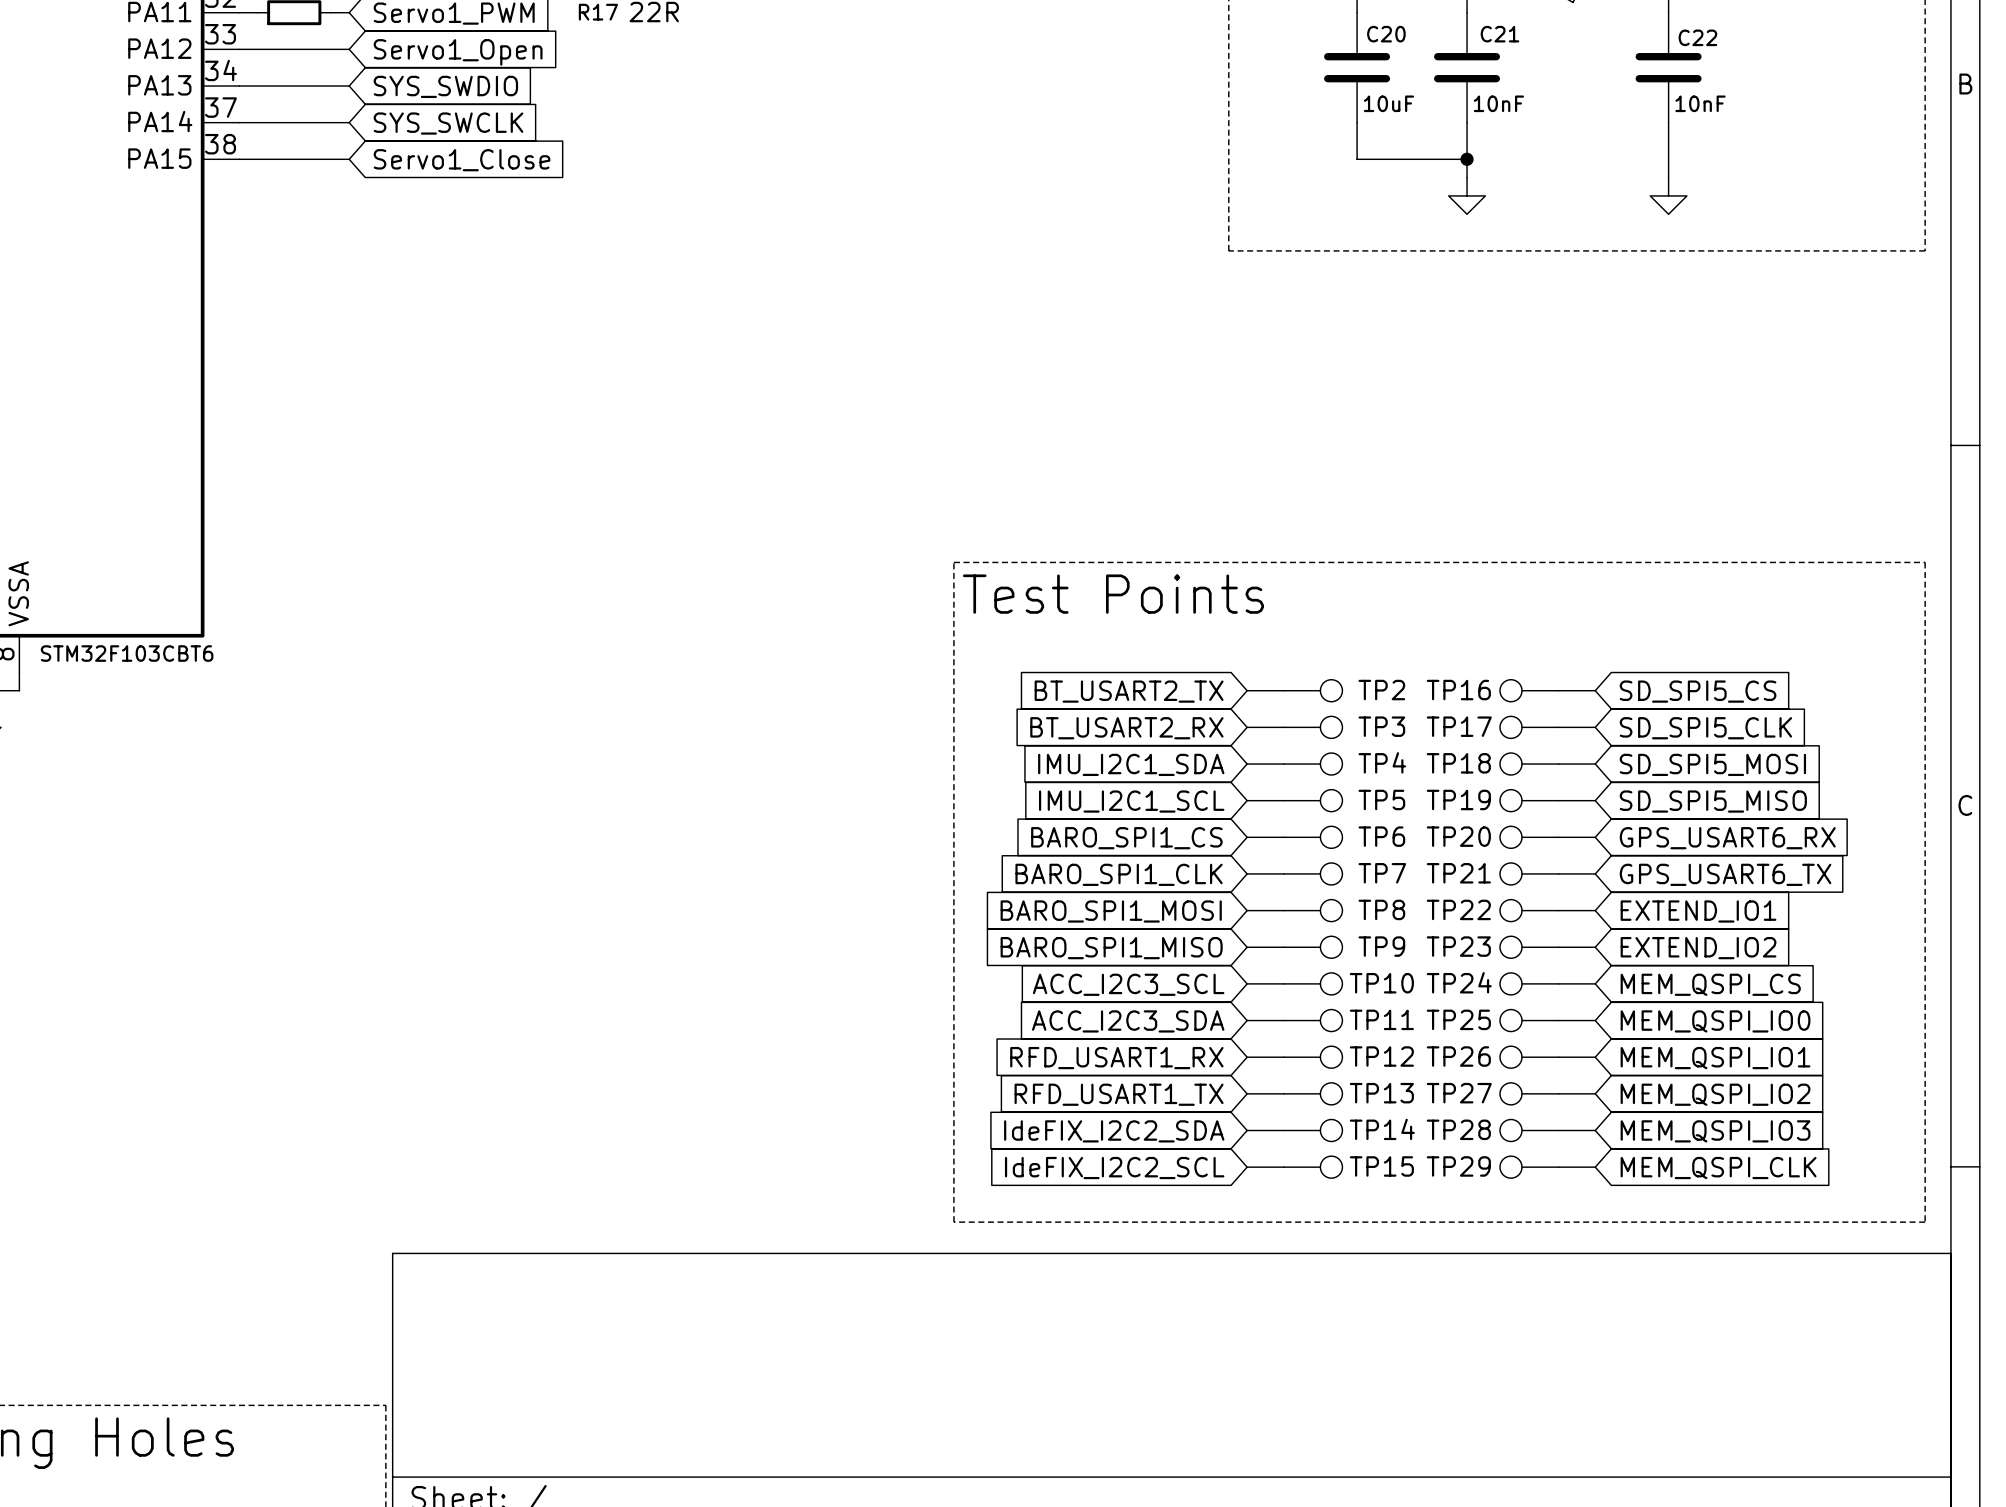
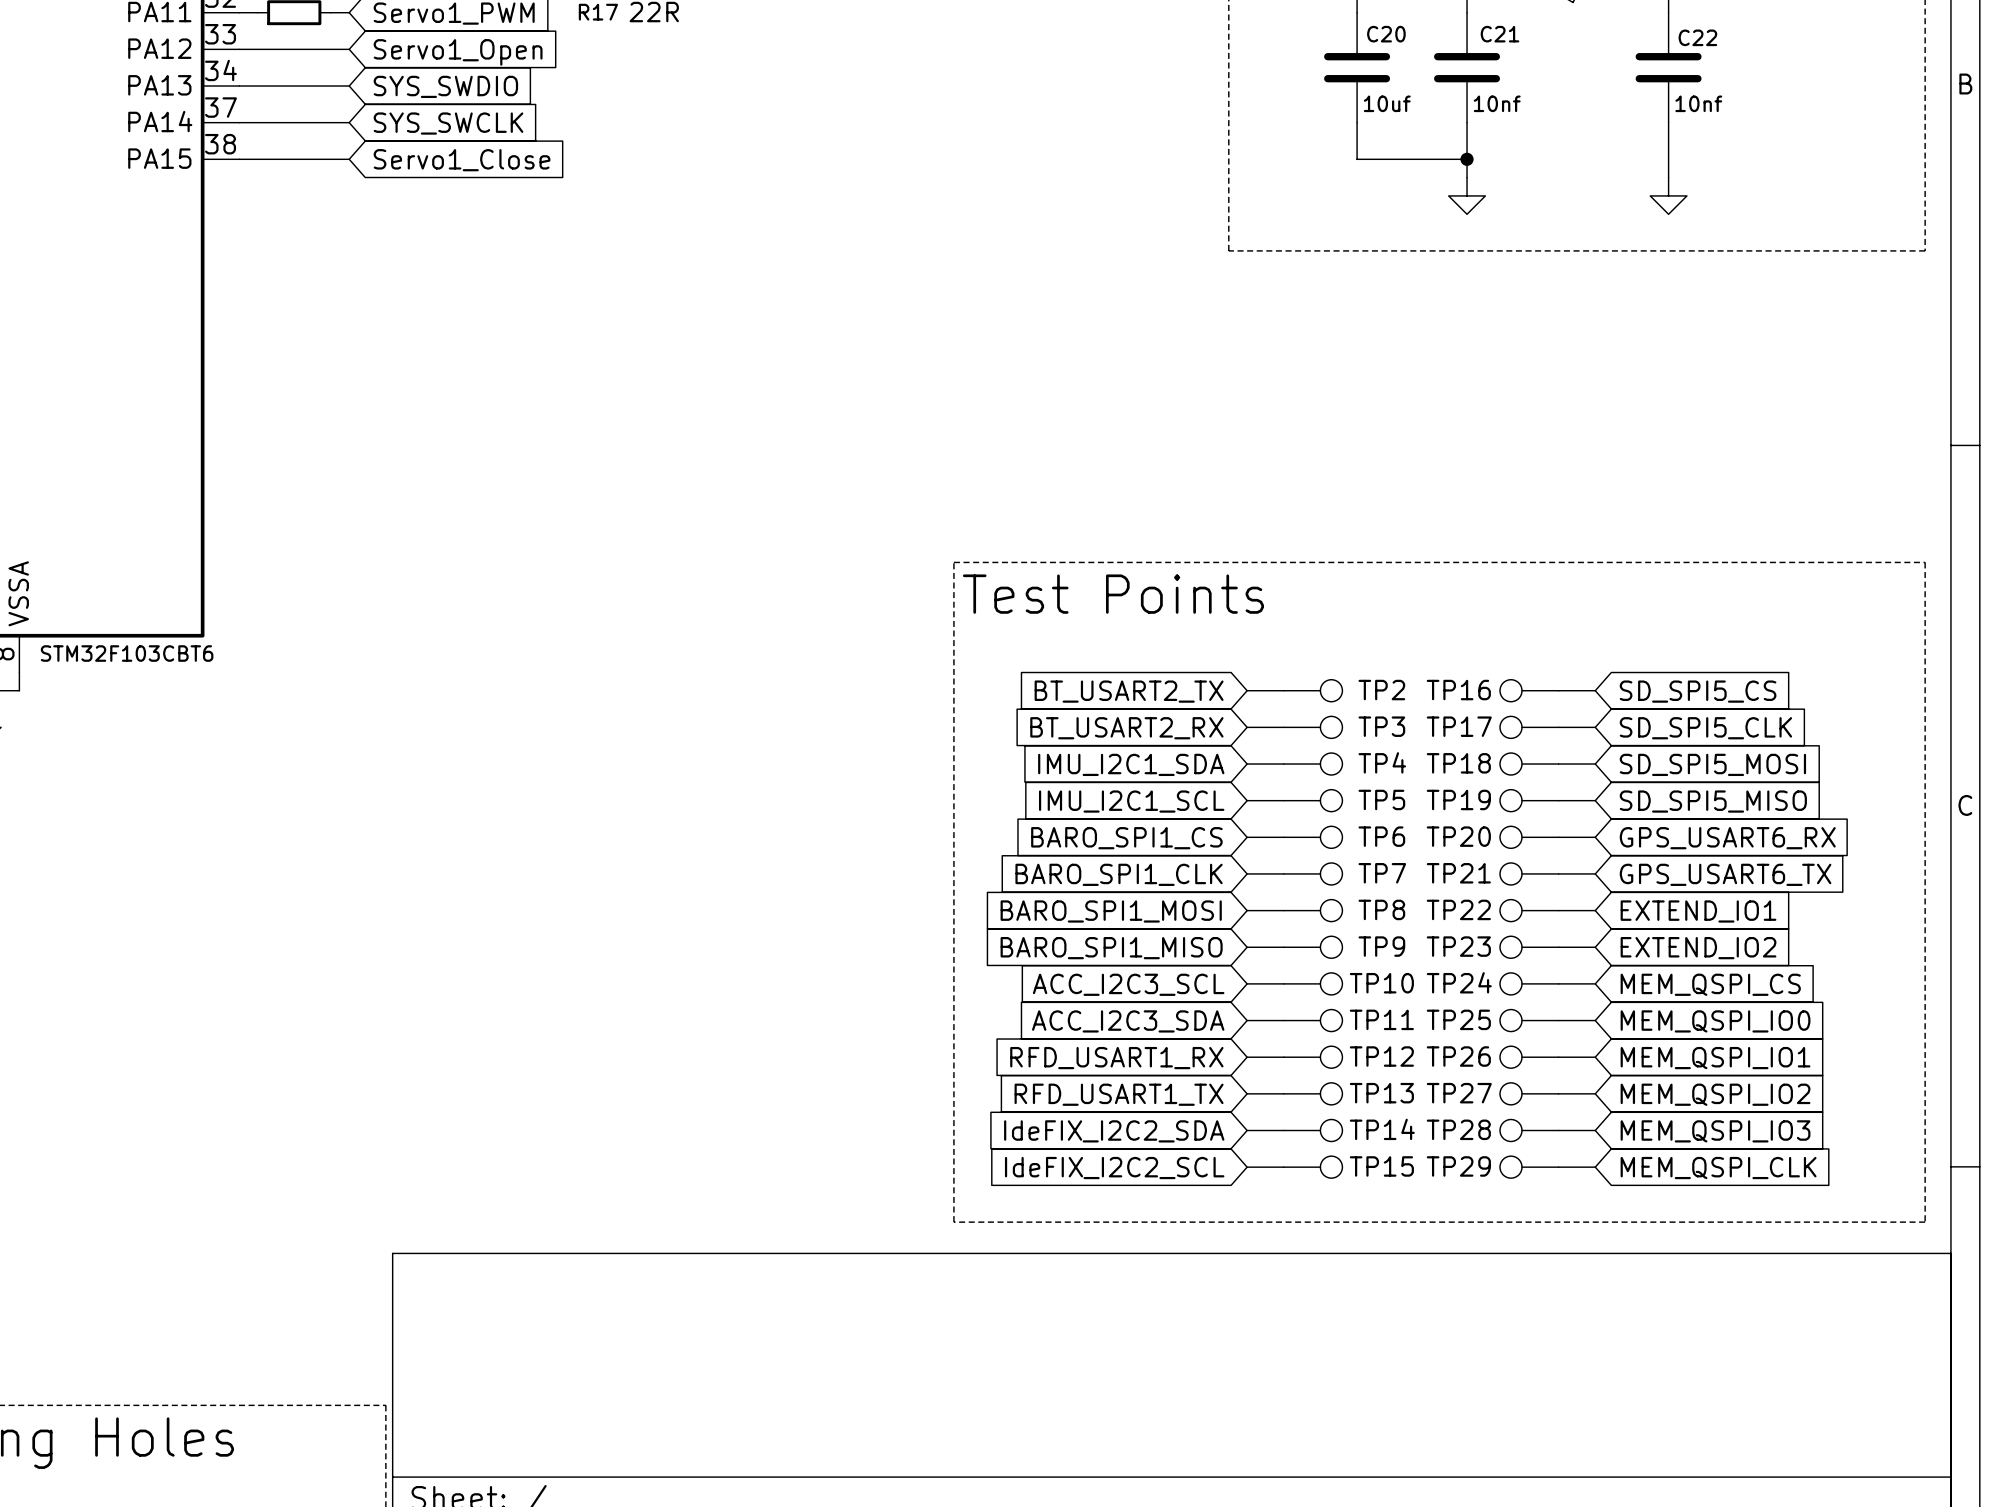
C20 value: 10uF (1388, 103) -> 10uf (1387, 103)
C21 value: 10nF (1498, 103) -> 10nf (1497, 103)
C22 value: 10nF (1700, 103) -> 10nf (1698, 103)

